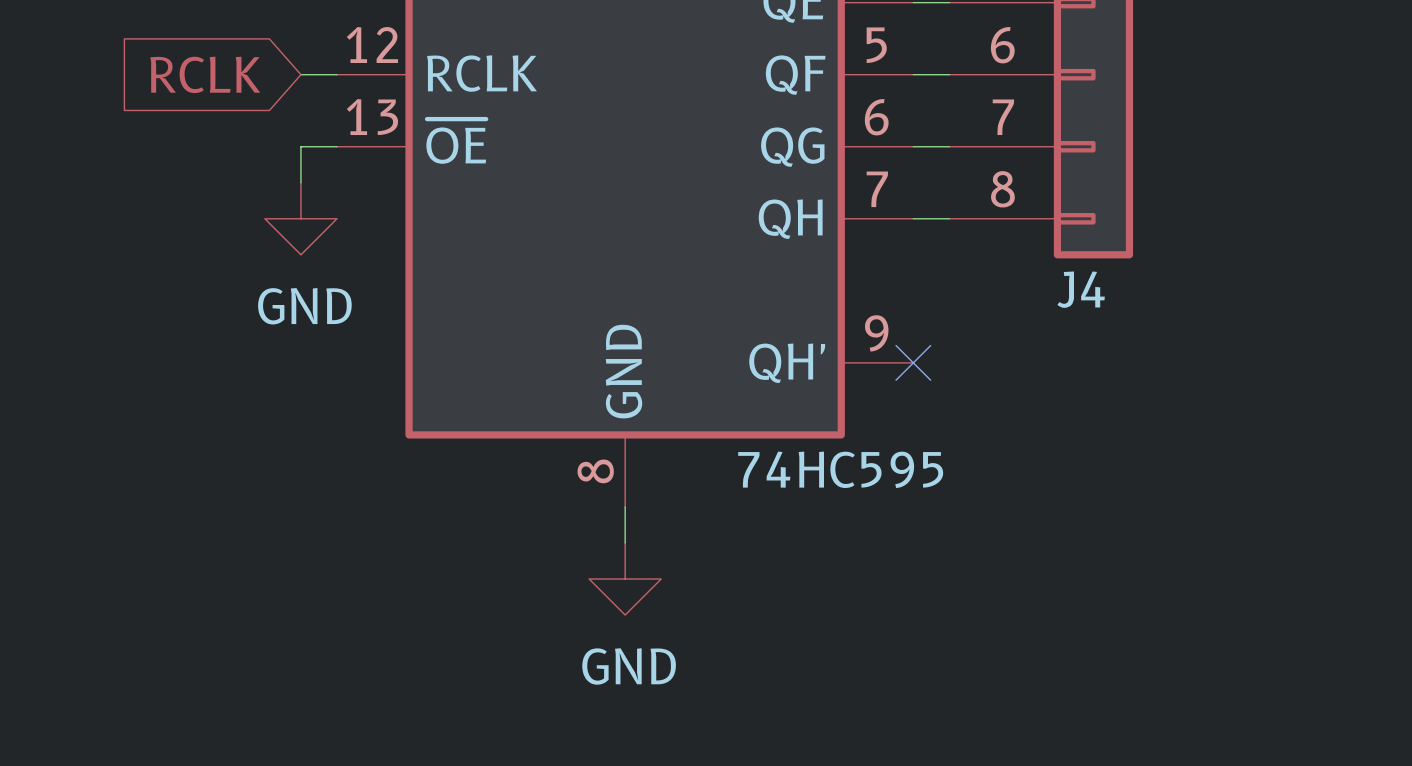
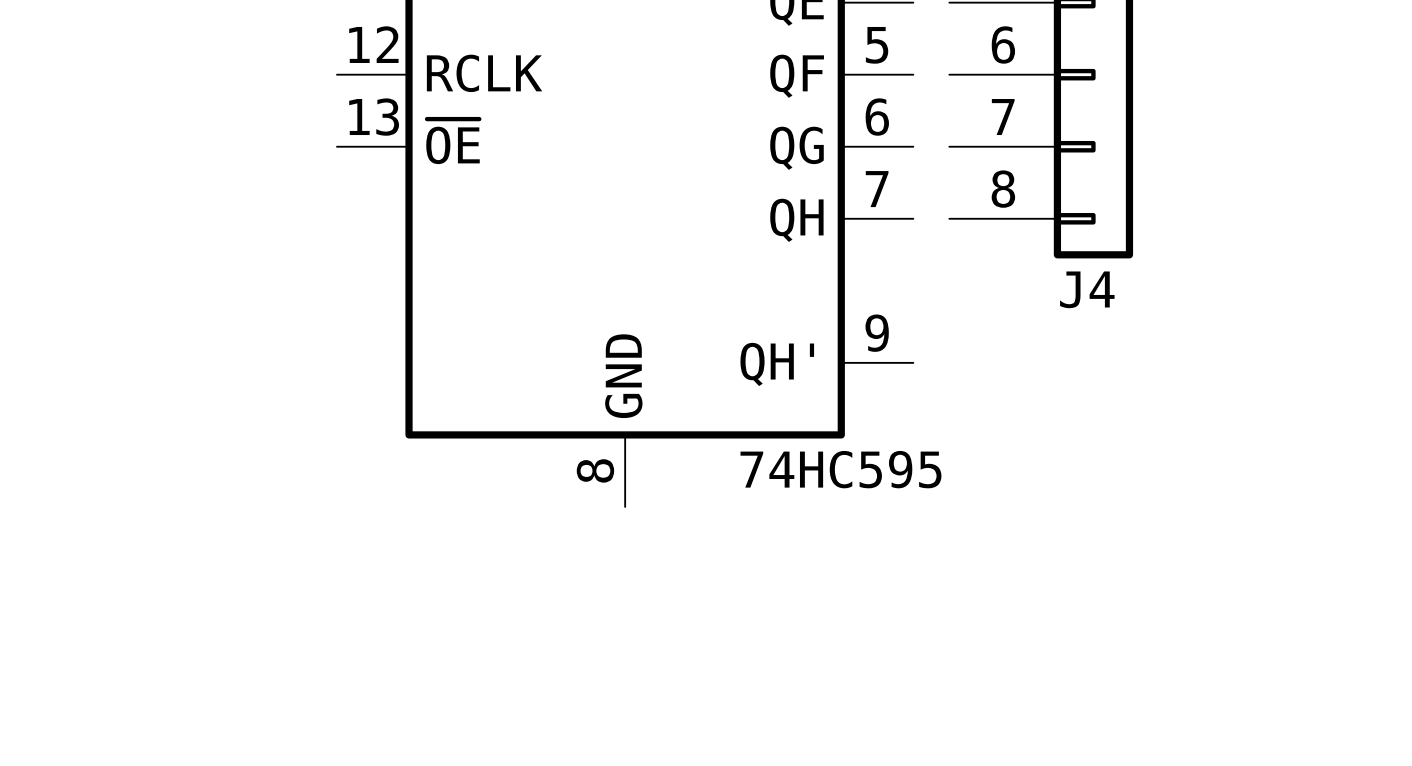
wire: (913, 2) (949, 2) -> none
global label: RCLK (205, 74) -> none
wire: (300, 74) (336, 74) -> none
wire: (913, 74) (949, 74) -> none
wire: (336, 146) (300, 146) (300, 182) -> none
wire: (913, 146) (949, 146) -> none
power symbol: GND (300, 218) -> none
wire: (913, 218) (949, 218) -> none
no-connect mark: (913, 362) -> none
wire: (625, 506) (625, 542) -> none
power symbol: GND (625, 579) -> none

